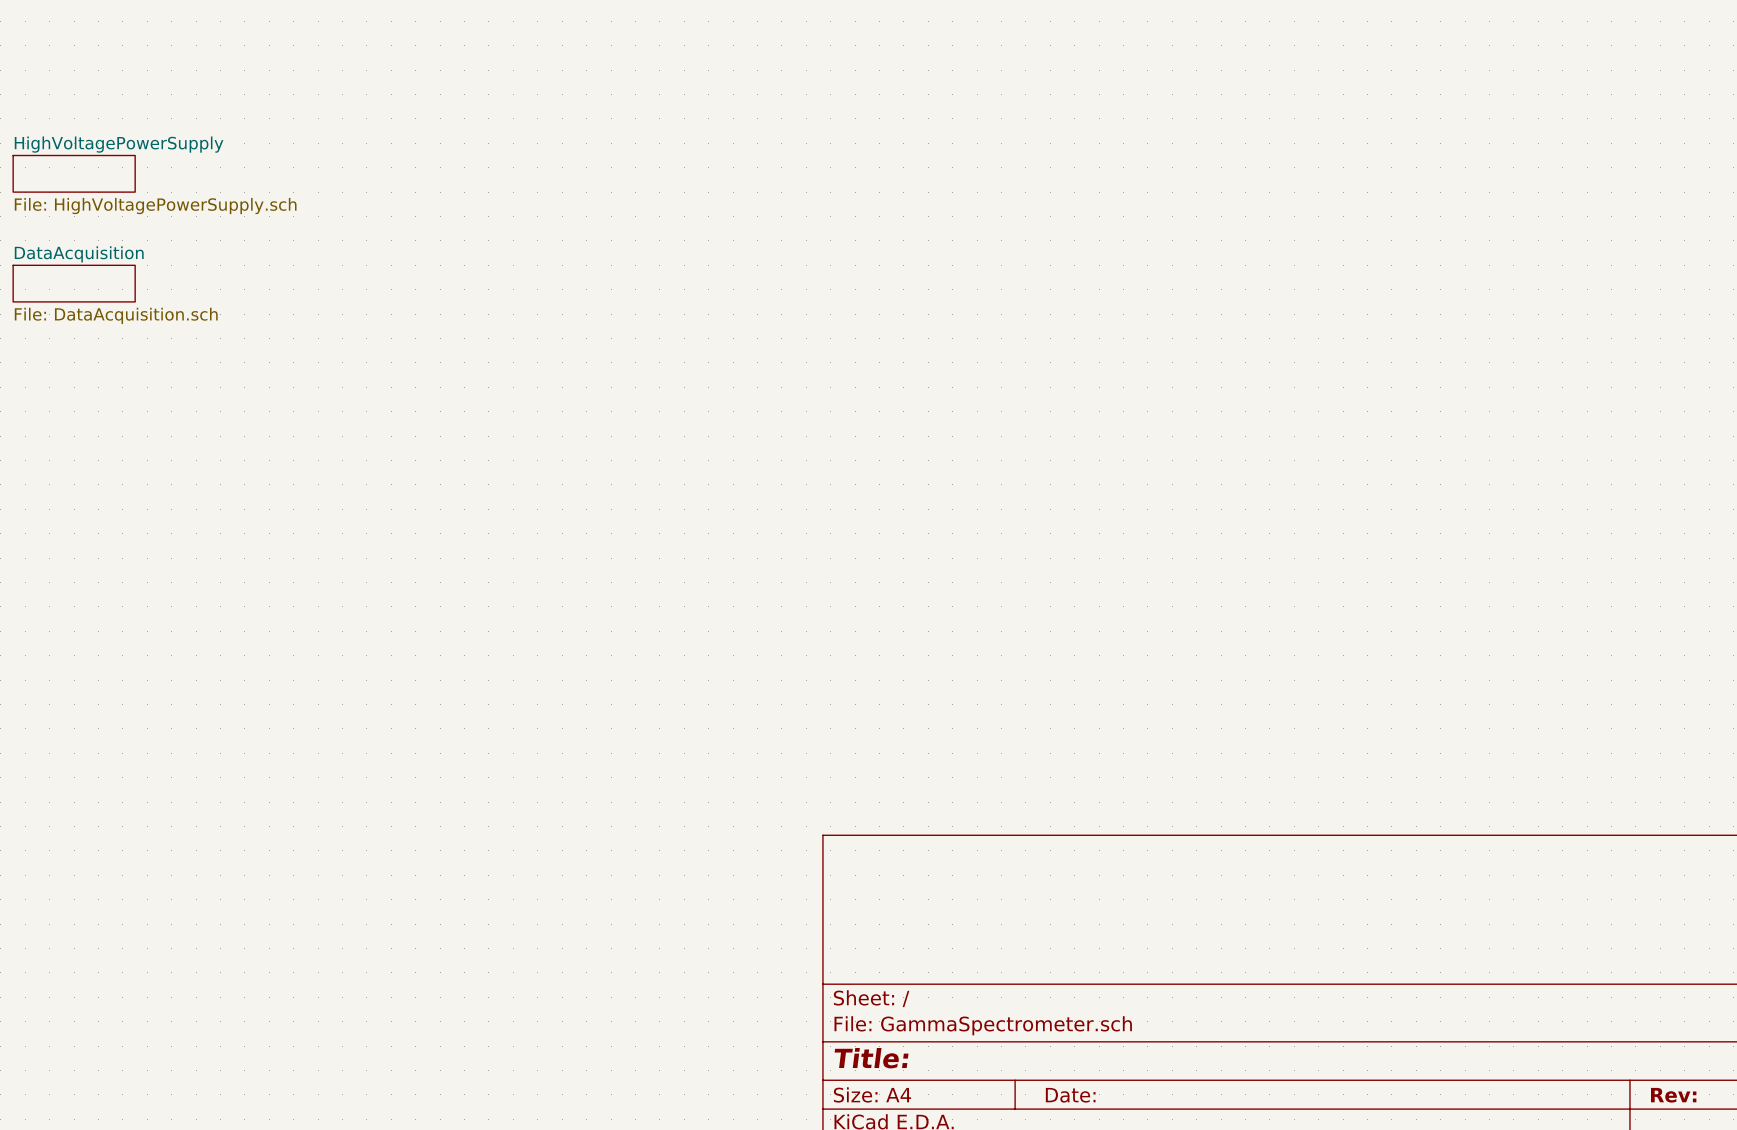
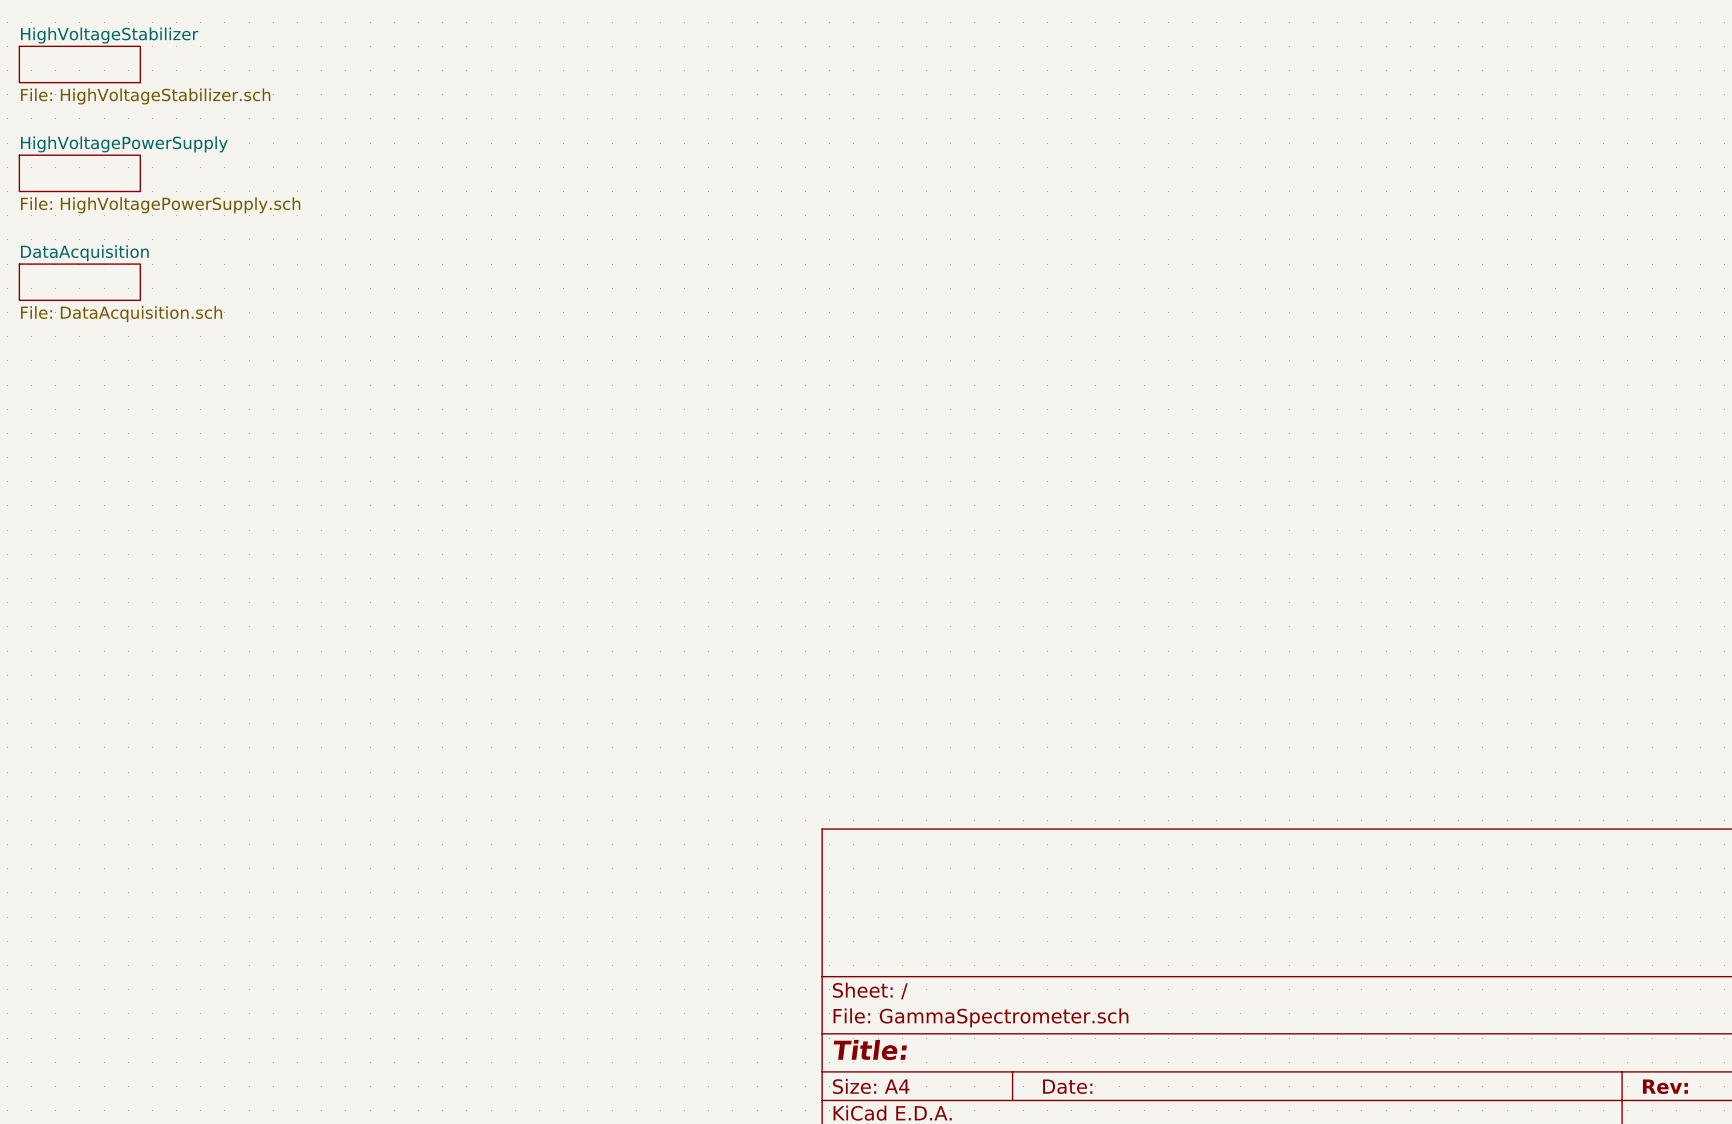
sheet HighVoltageStabilizer: none -> File: HighVoltageStabilizer.sch (79, 64)

